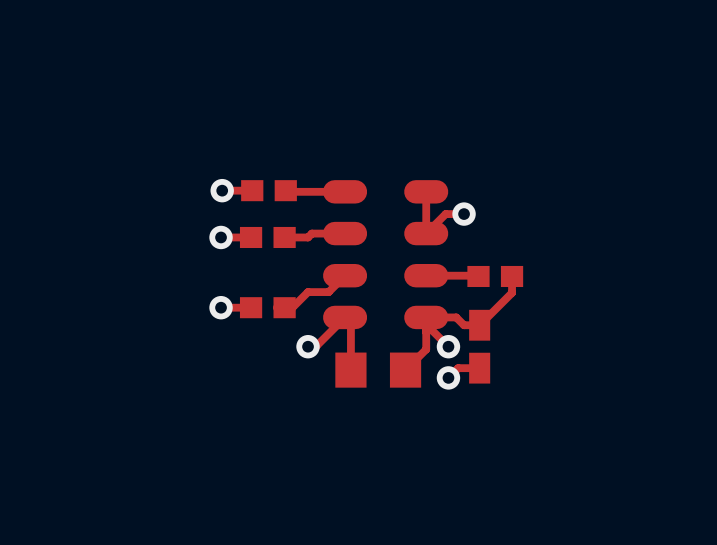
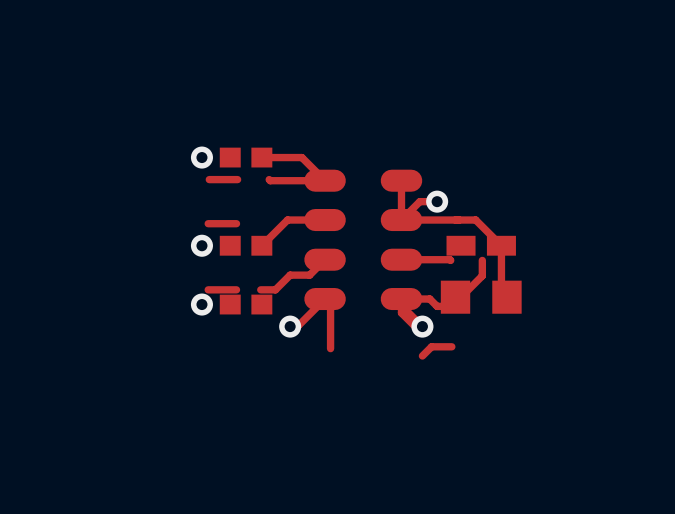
top track: none -> (261, 157) (301, 157) (325, 180)
via position: (222, 190) -> (201, 157)
part position: (269, 190) -> (246, 157)
top track: (311, 233) (308, 237) (284, 237) -> (293, 220) (287, 220) (261, 245)
top track: none -> (401, 220) (475, 220) (501, 245) (501, 291) (506, 297)
via: (221, 237) -> none
part position: (267, 237) -> (246, 245)
via: none -> (201, 245)
part: (495, 276) -> none
via position: (221, 307) -> (201, 304)
part position: (267, 307) -> (246, 304)
top track: (426, 332) (426, 349) (405, 370) -> (401, 312) (415, 326)
part rotation: 0° (479, 346) -> 90° clockwise (481, 245)
part position: (479, 346) -> (481, 245)
part position: (378, 370) -> (481, 297)
via: (448, 377) -> none

